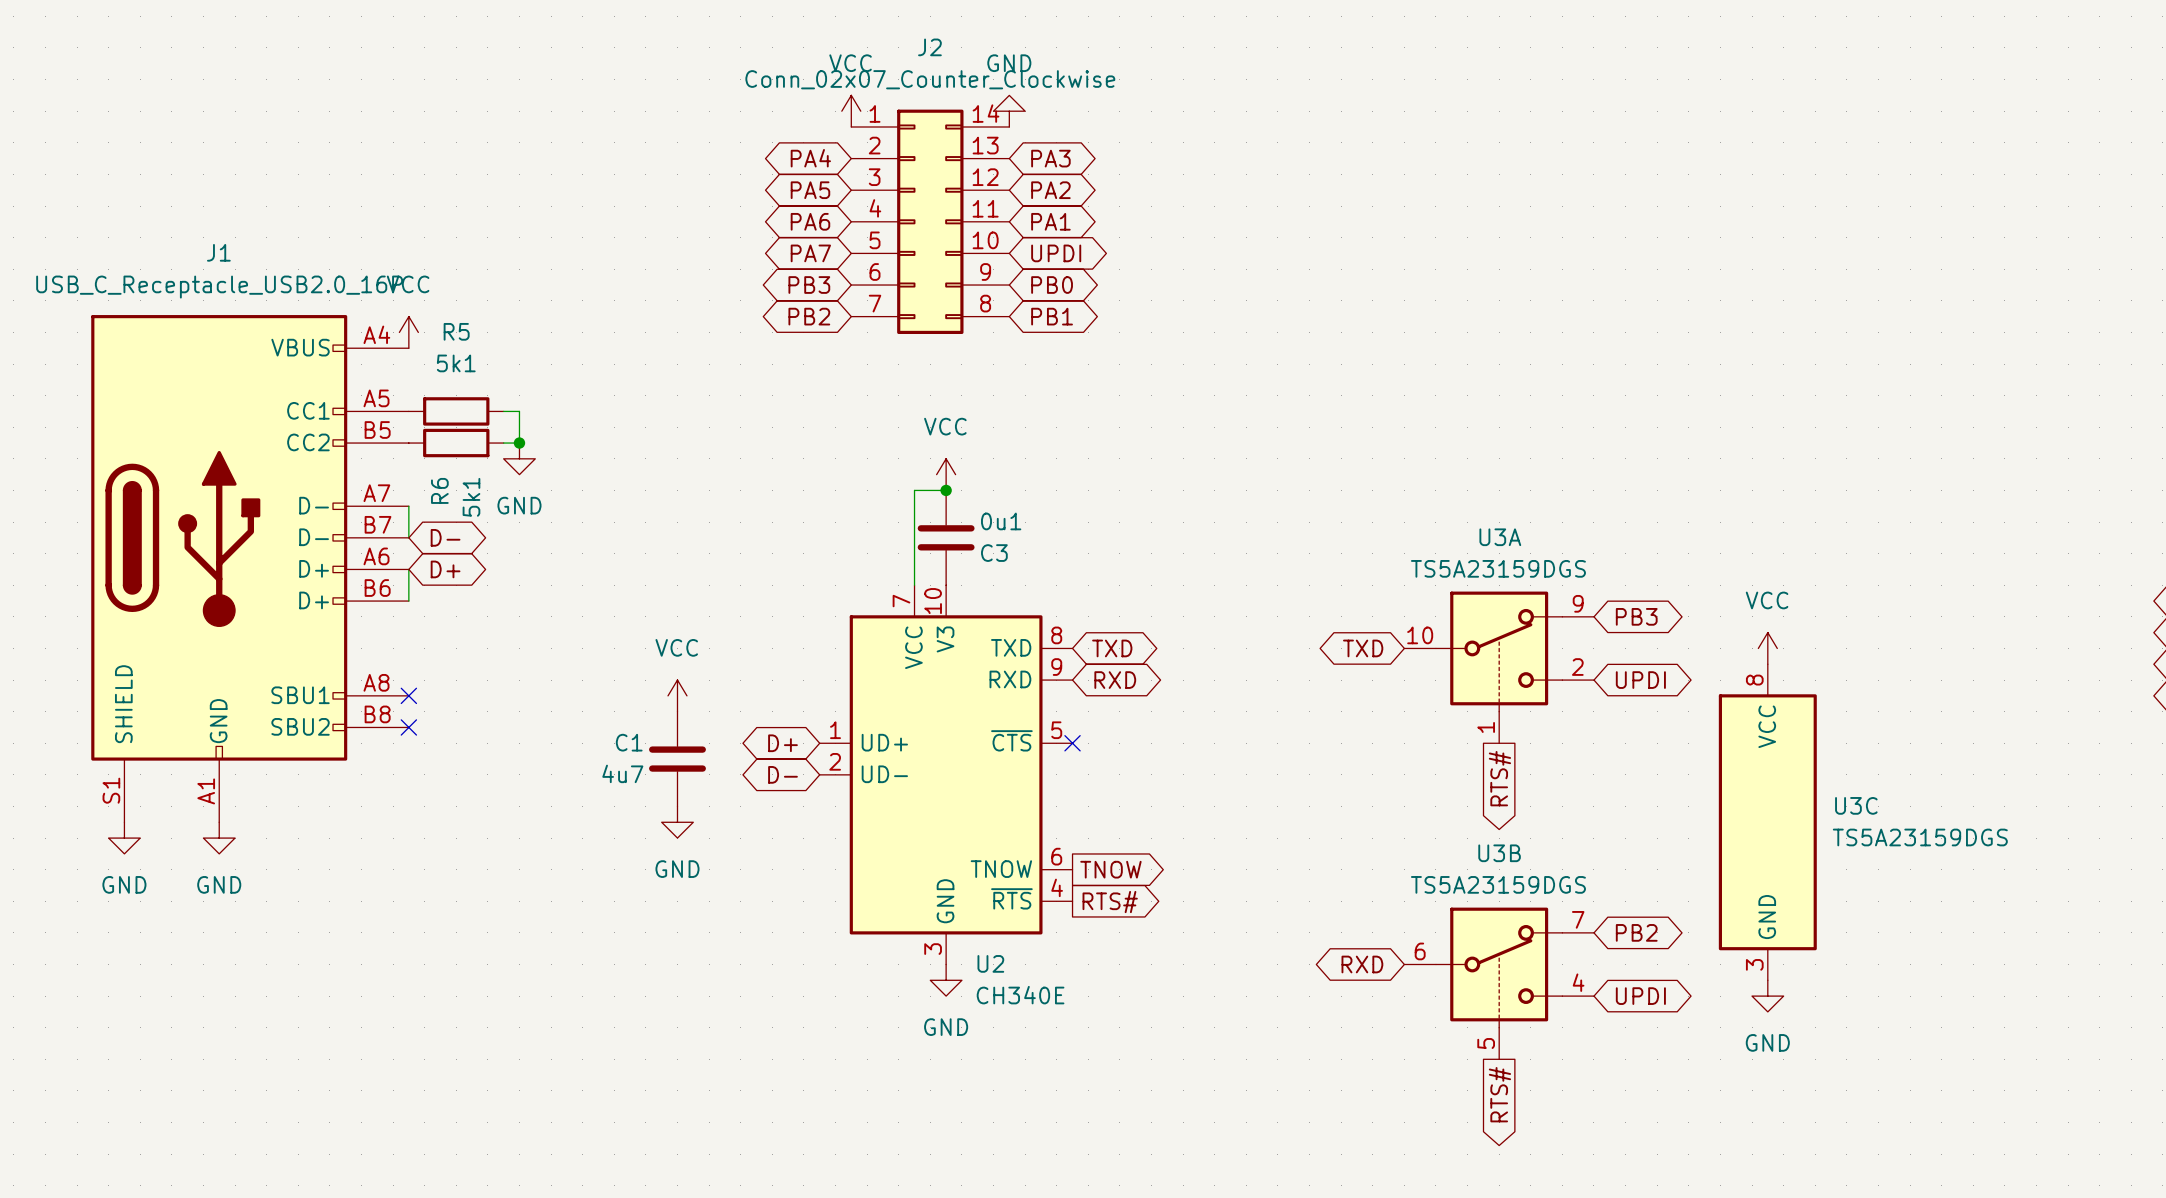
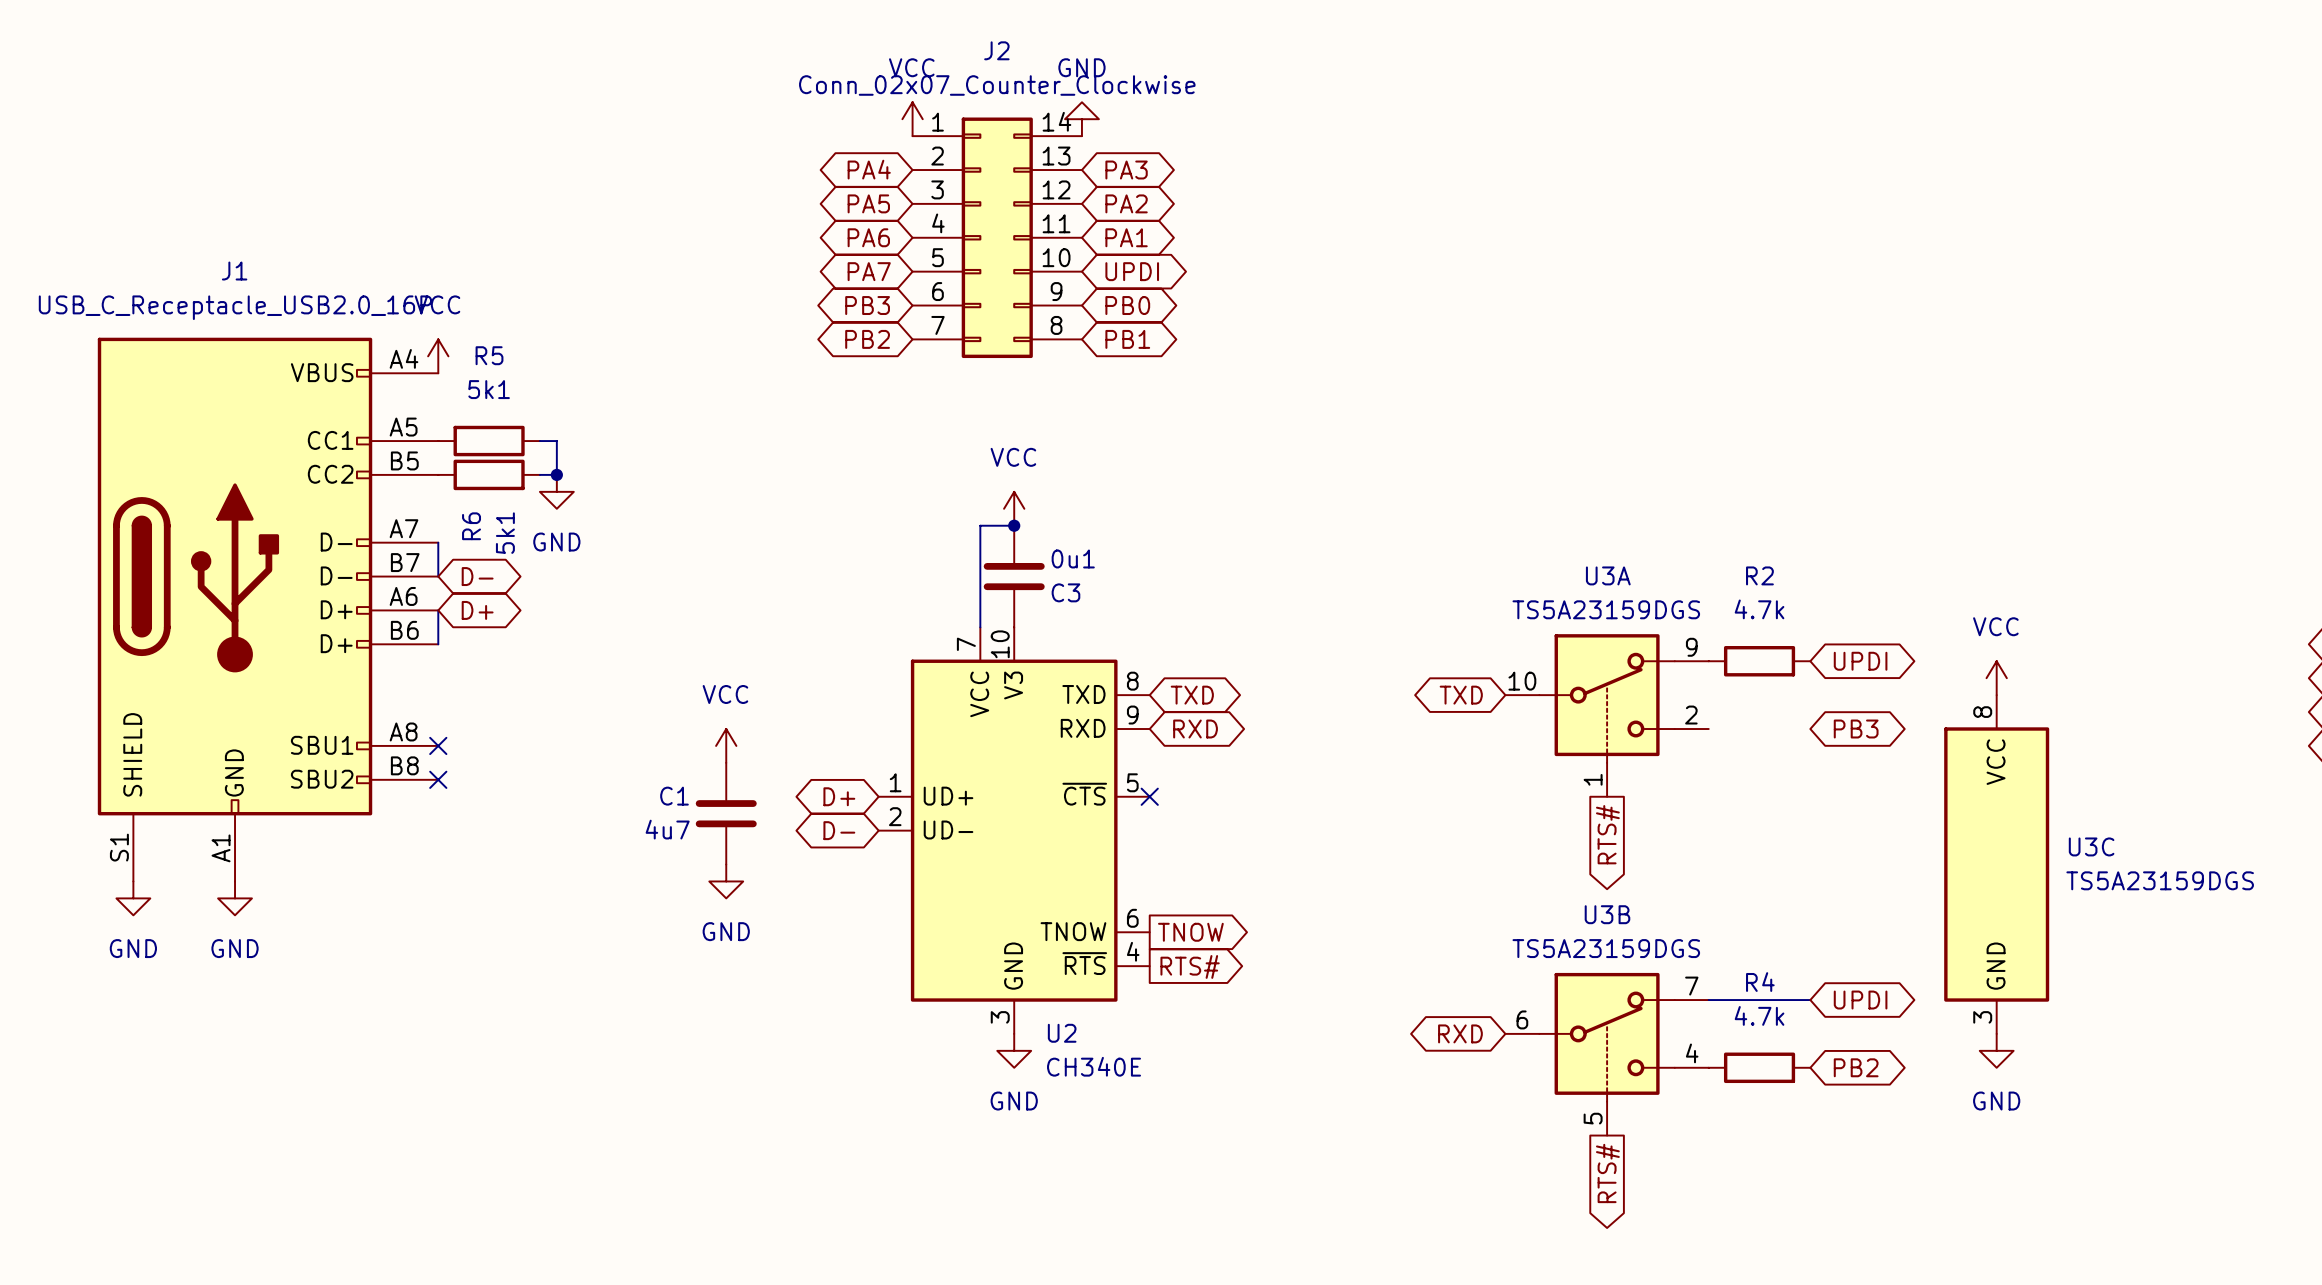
global label position: PB3 (1636, 616) -> PB3 (1856, 729)
R2: none -> 4.7k (1759, 661)
power symbol position: VCC (1767, 648) -> VCC (1996, 678)
global label position: UPDI (1640, 680) -> UPDI (1860, 661)
U3C position: (1767, 822) -> (1996, 864)
wire: none -> (1708, 1000) (1810, 1000)
global label position: PB2 (1636, 932) -> PB2 (1856, 1067)
global label position: UPDI (1640, 996) -> UPDI (1860, 1000)
R4: none -> 4.7k (1759, 1067)
power symbol position: GND (1767, 996) -> GND (1996, 1050)

